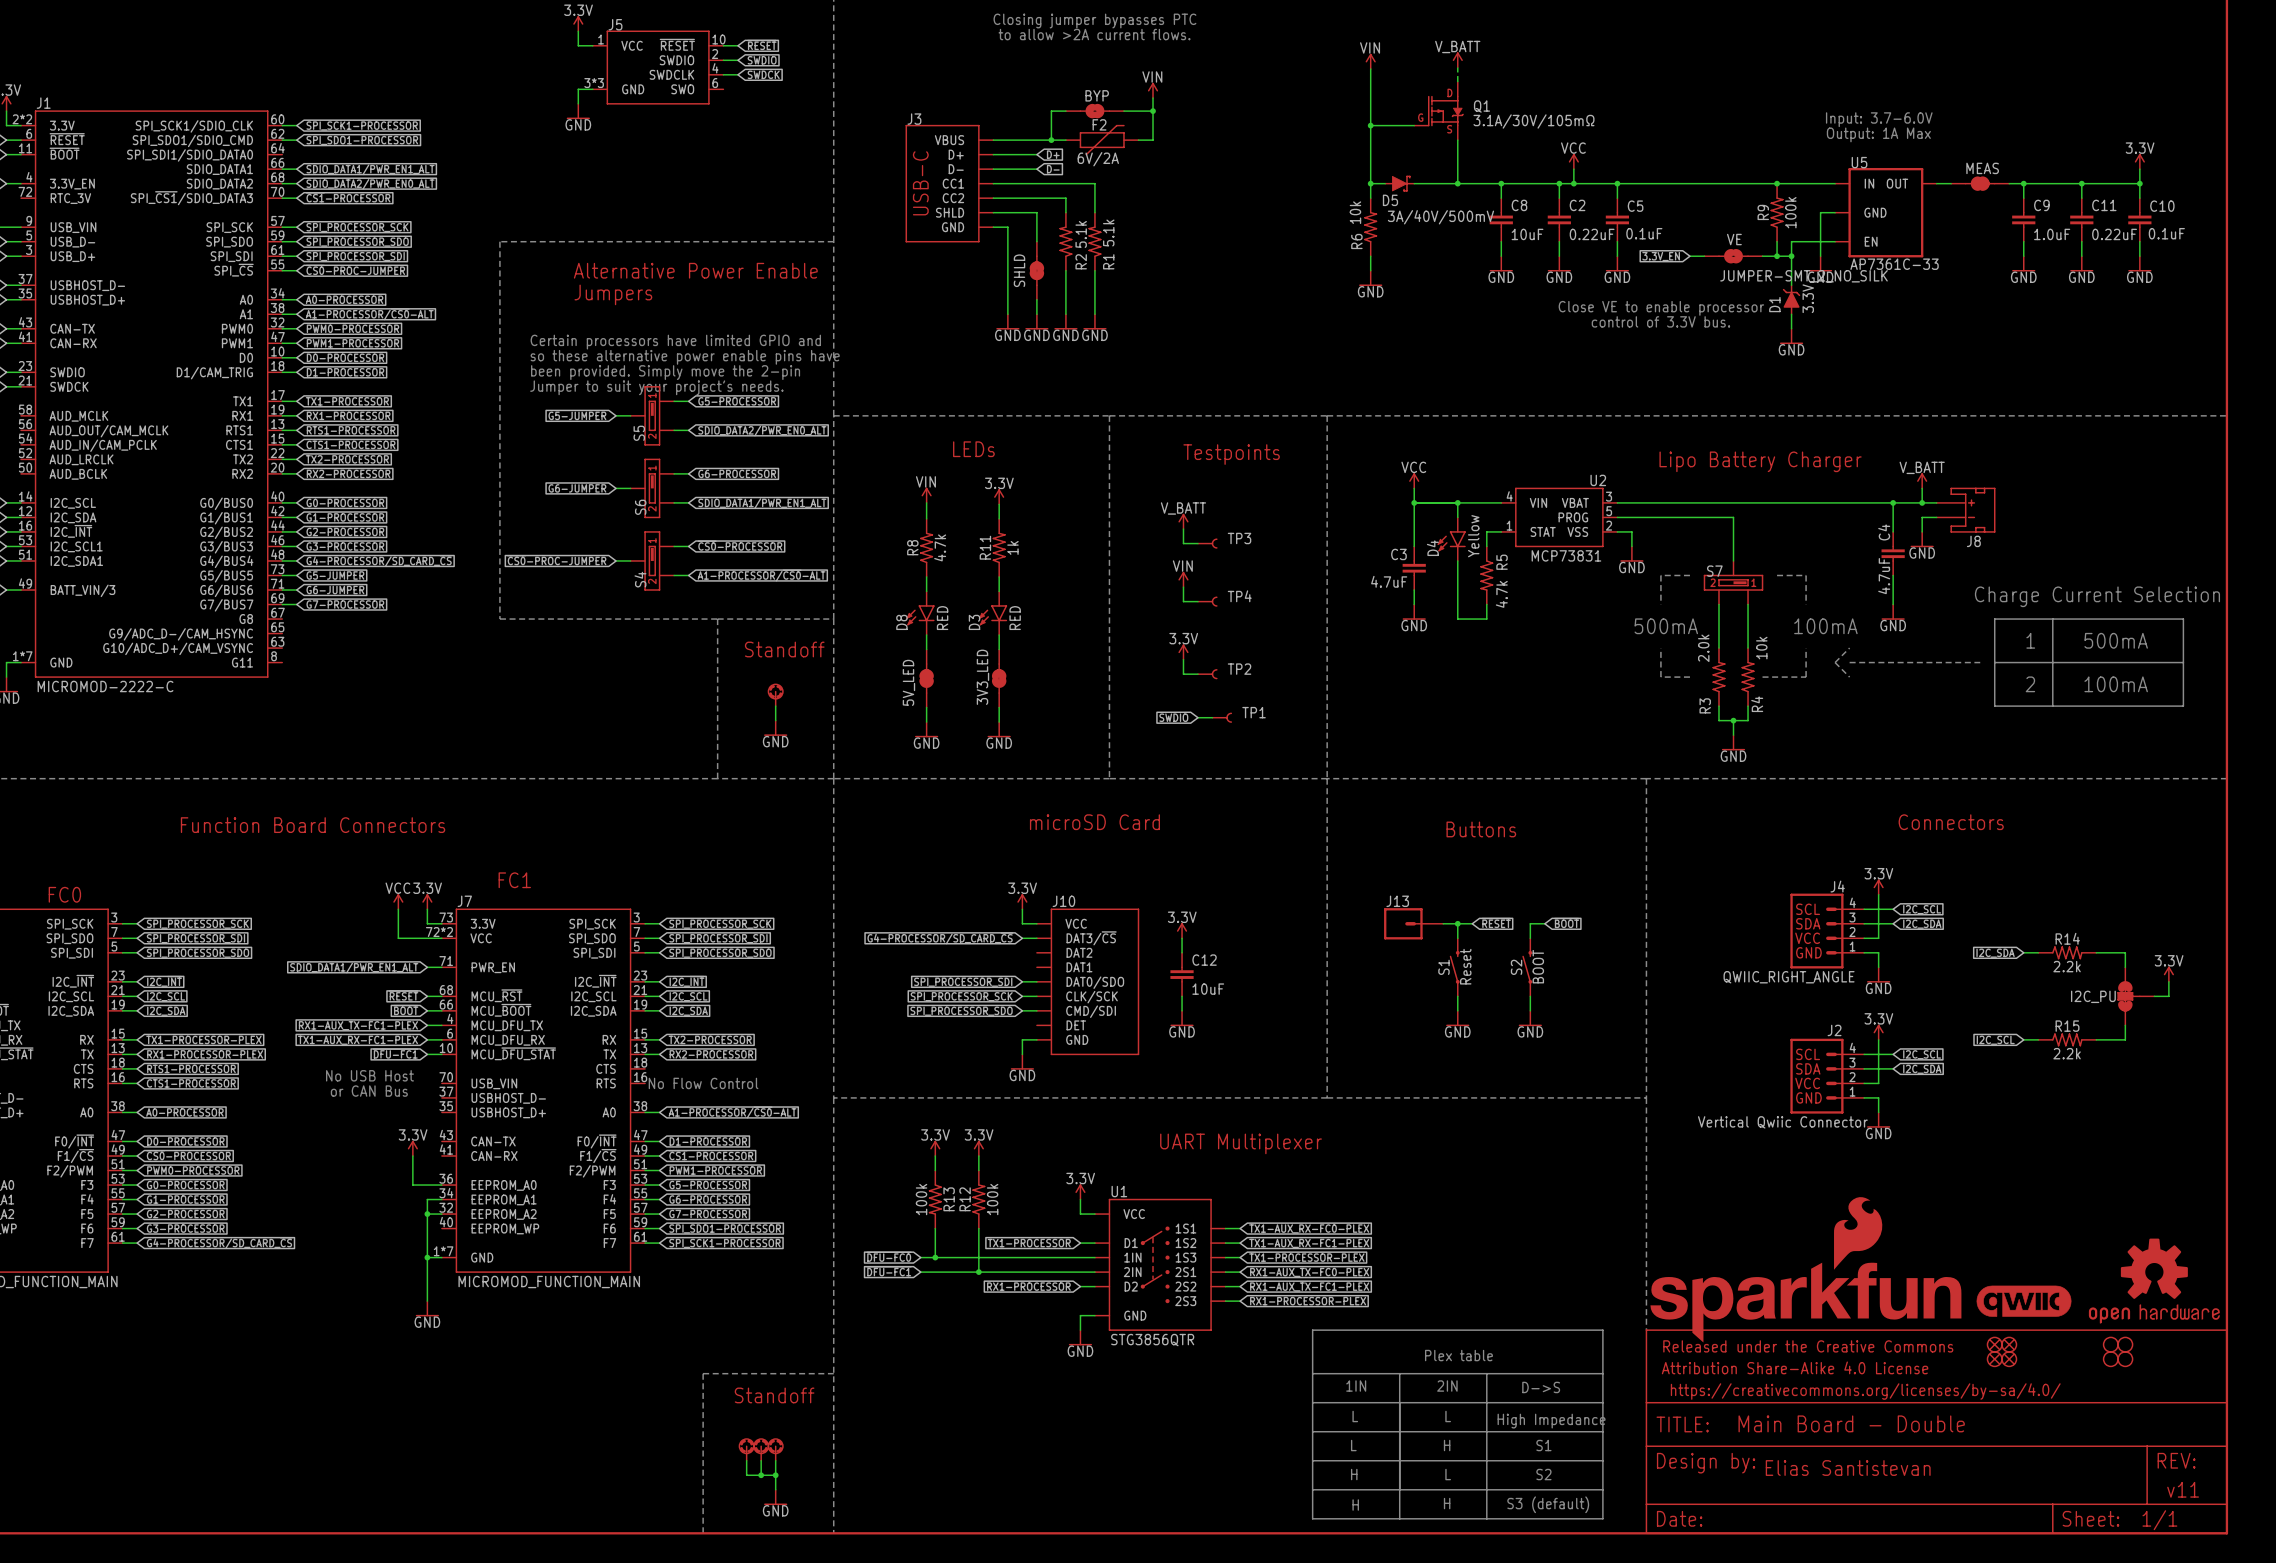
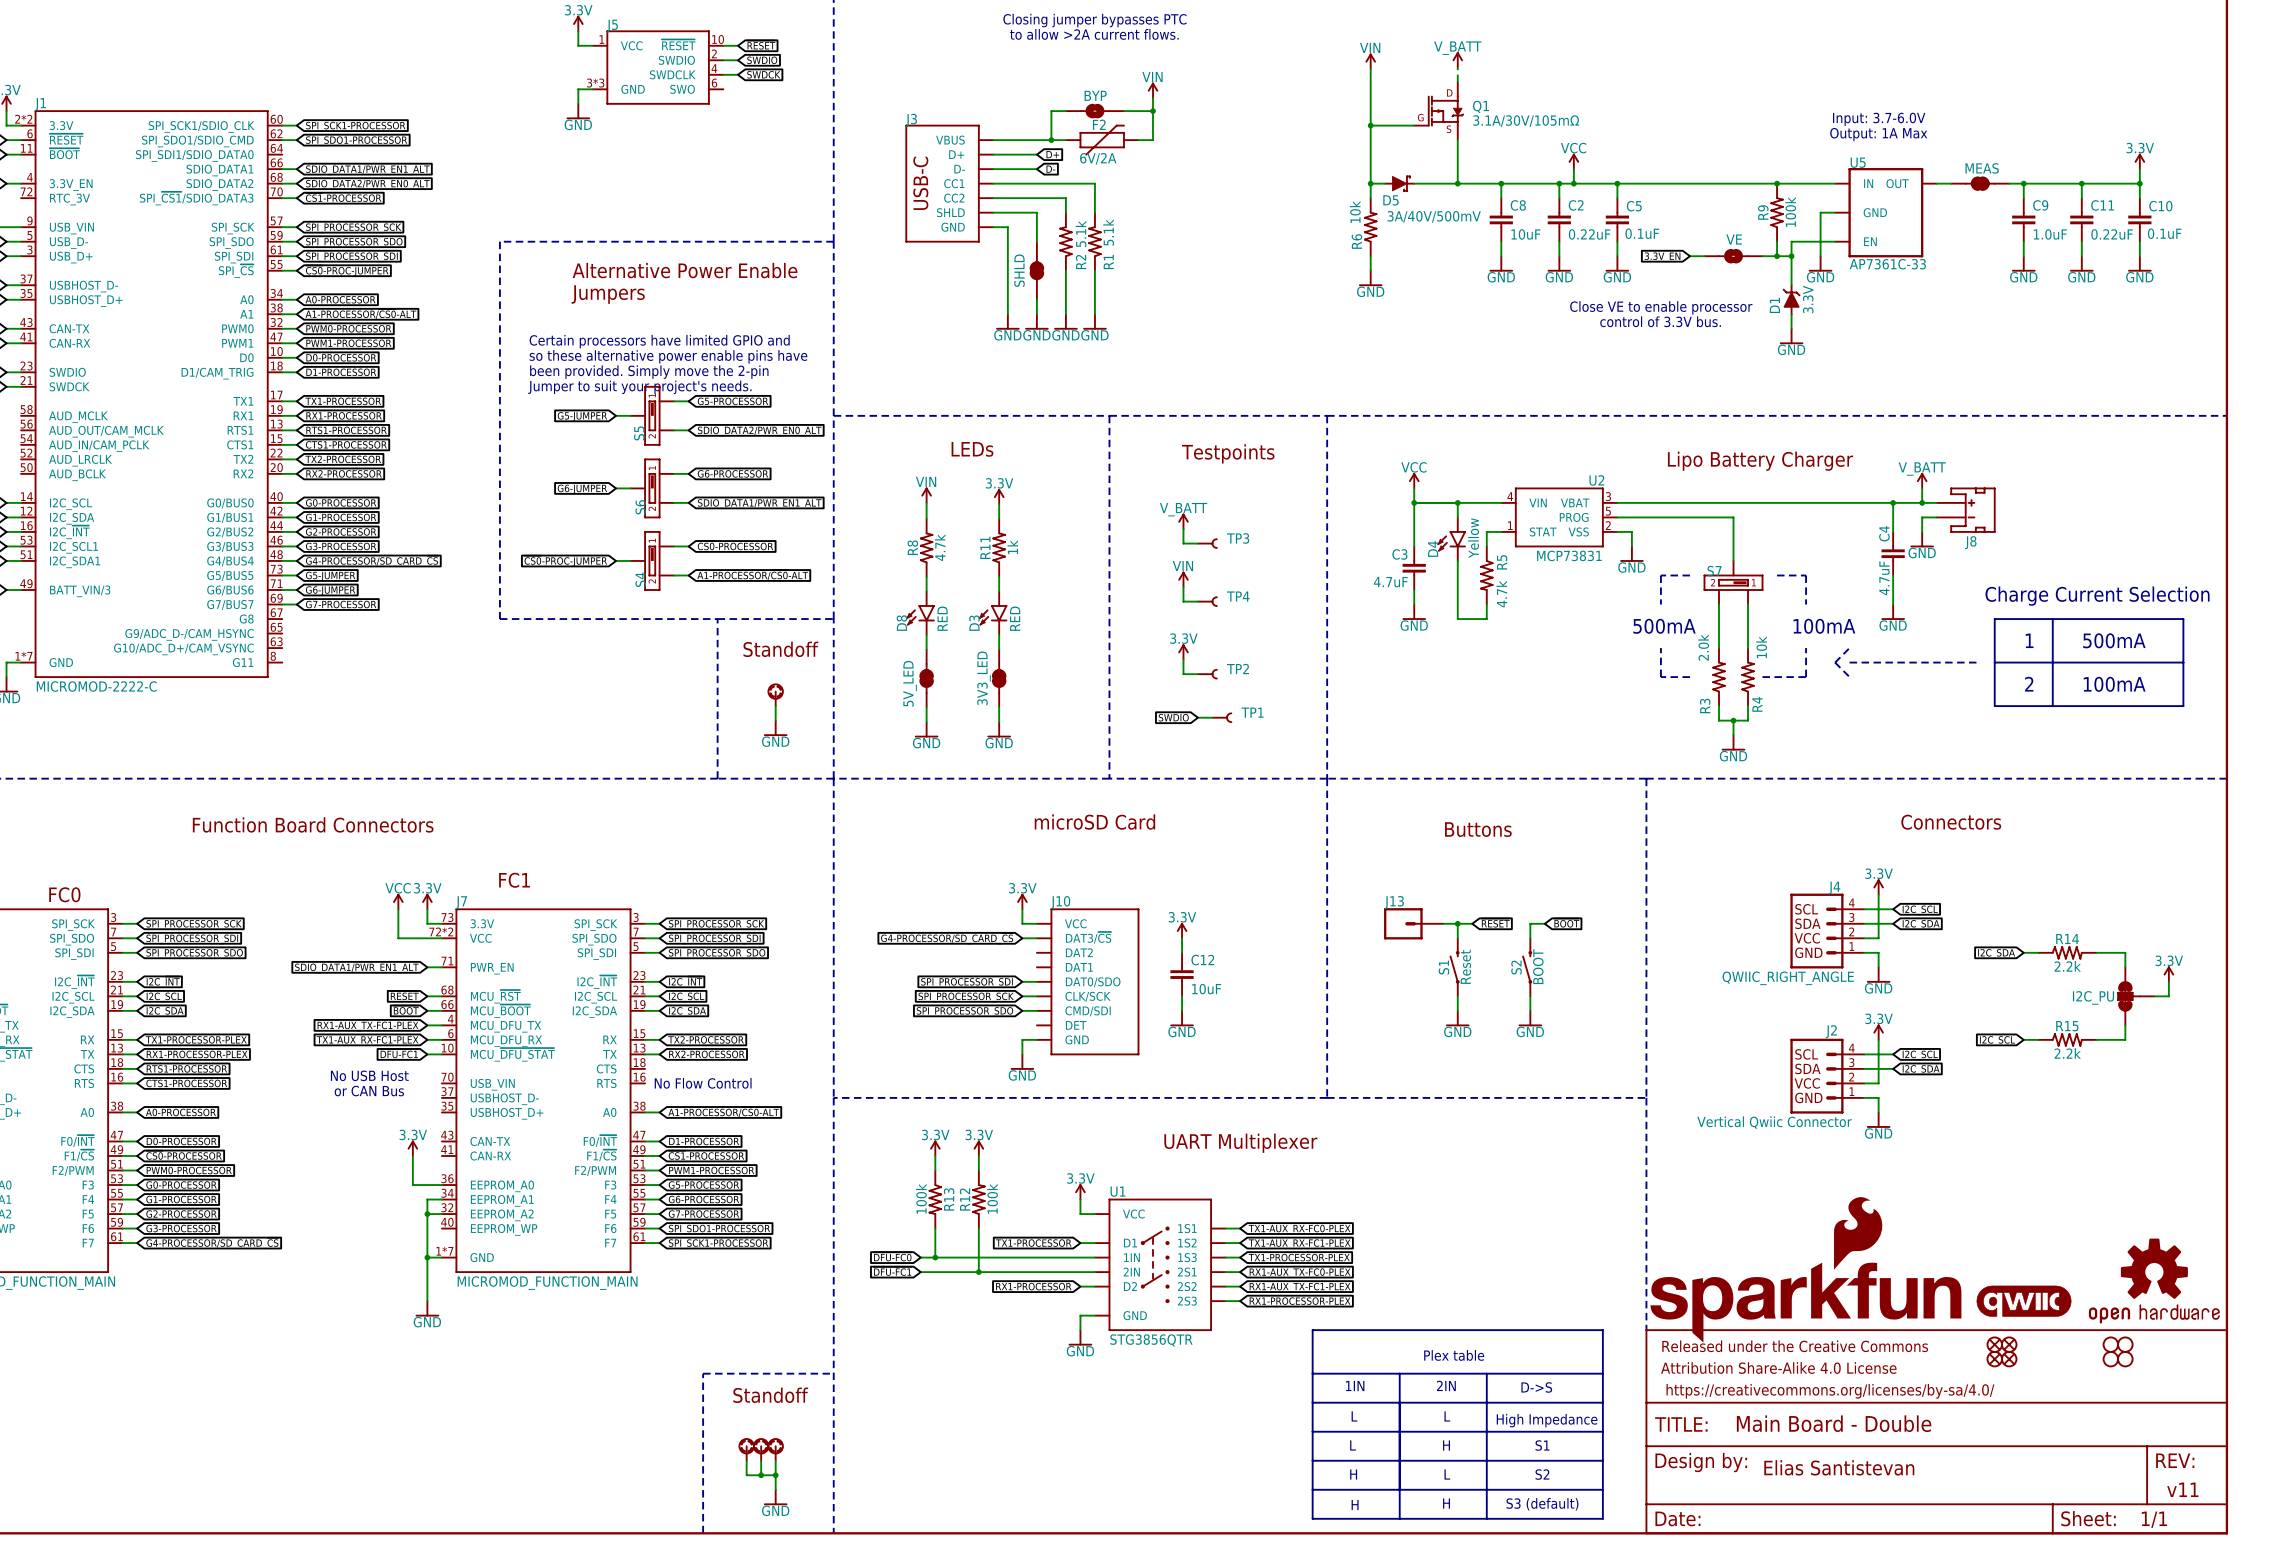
VE value: JUMPER-SMT_2_NO_SILK (1803, 276) -> none

